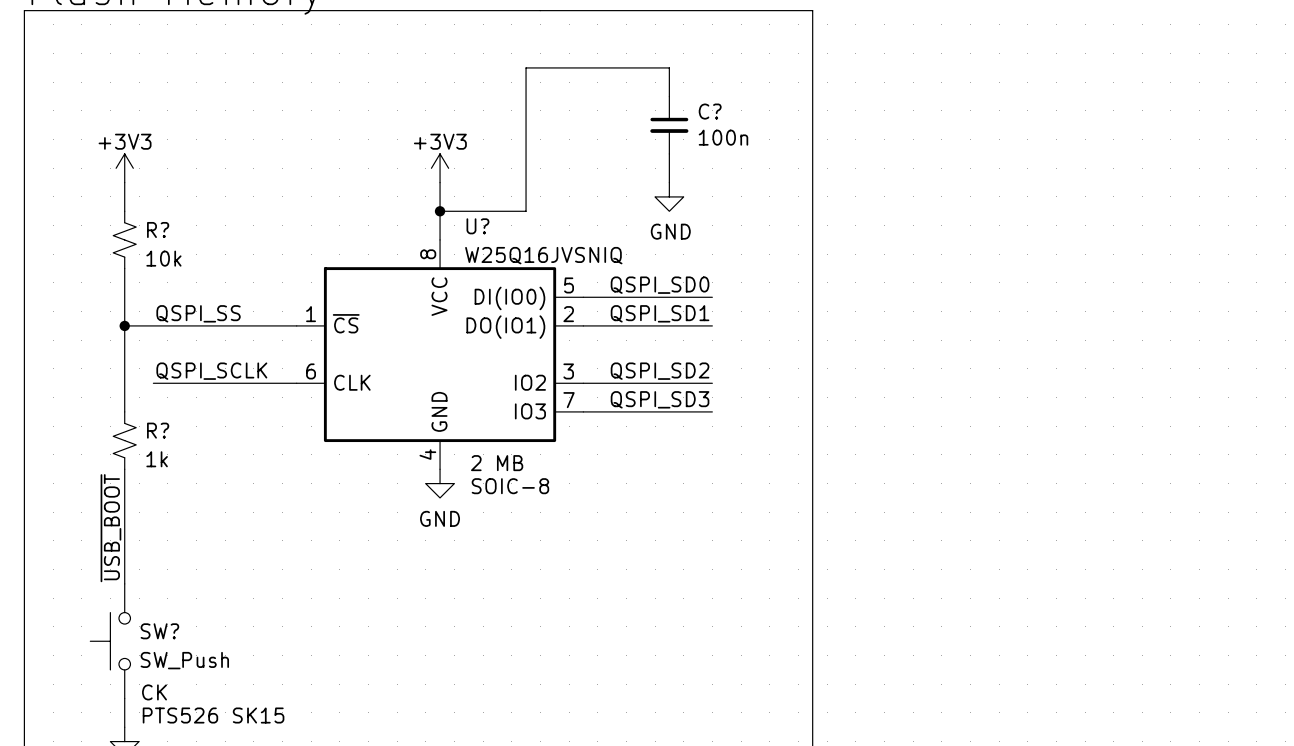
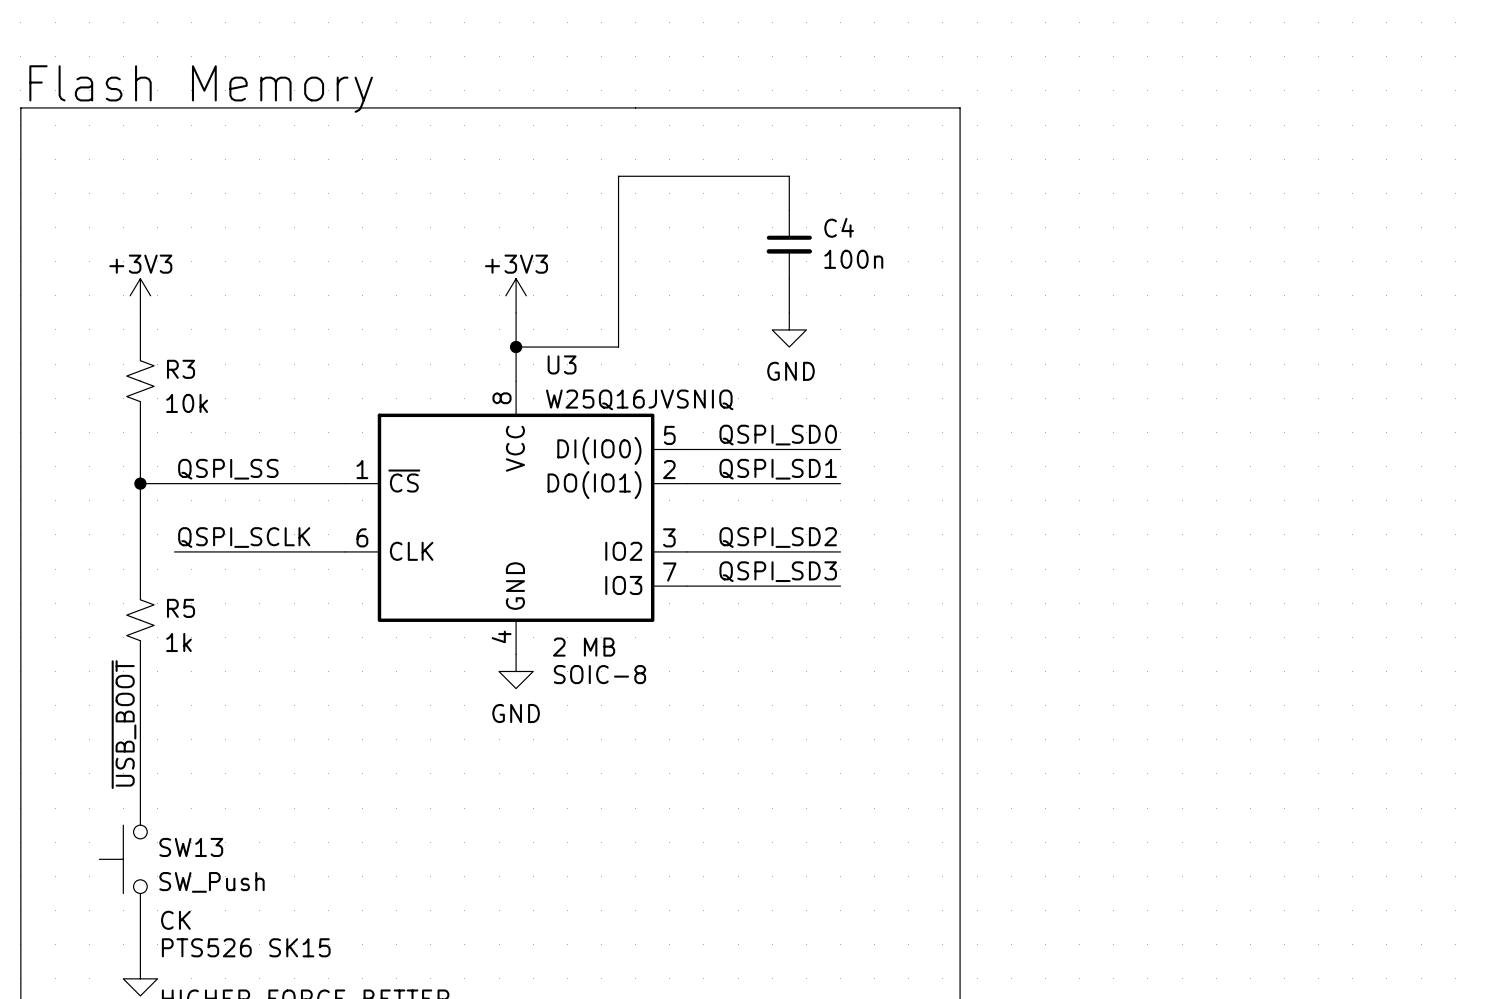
C? name: C? (710, 111) -> C4 (839, 227)
U? name: U? (477, 226) -> U3 (562, 364)
R? name: R? (158, 229) -> R3 (181, 369)
R? name: R? (158, 430) -> R5 (181, 608)
SW? name: SW? (159, 631) -> SW13 (191, 847)

